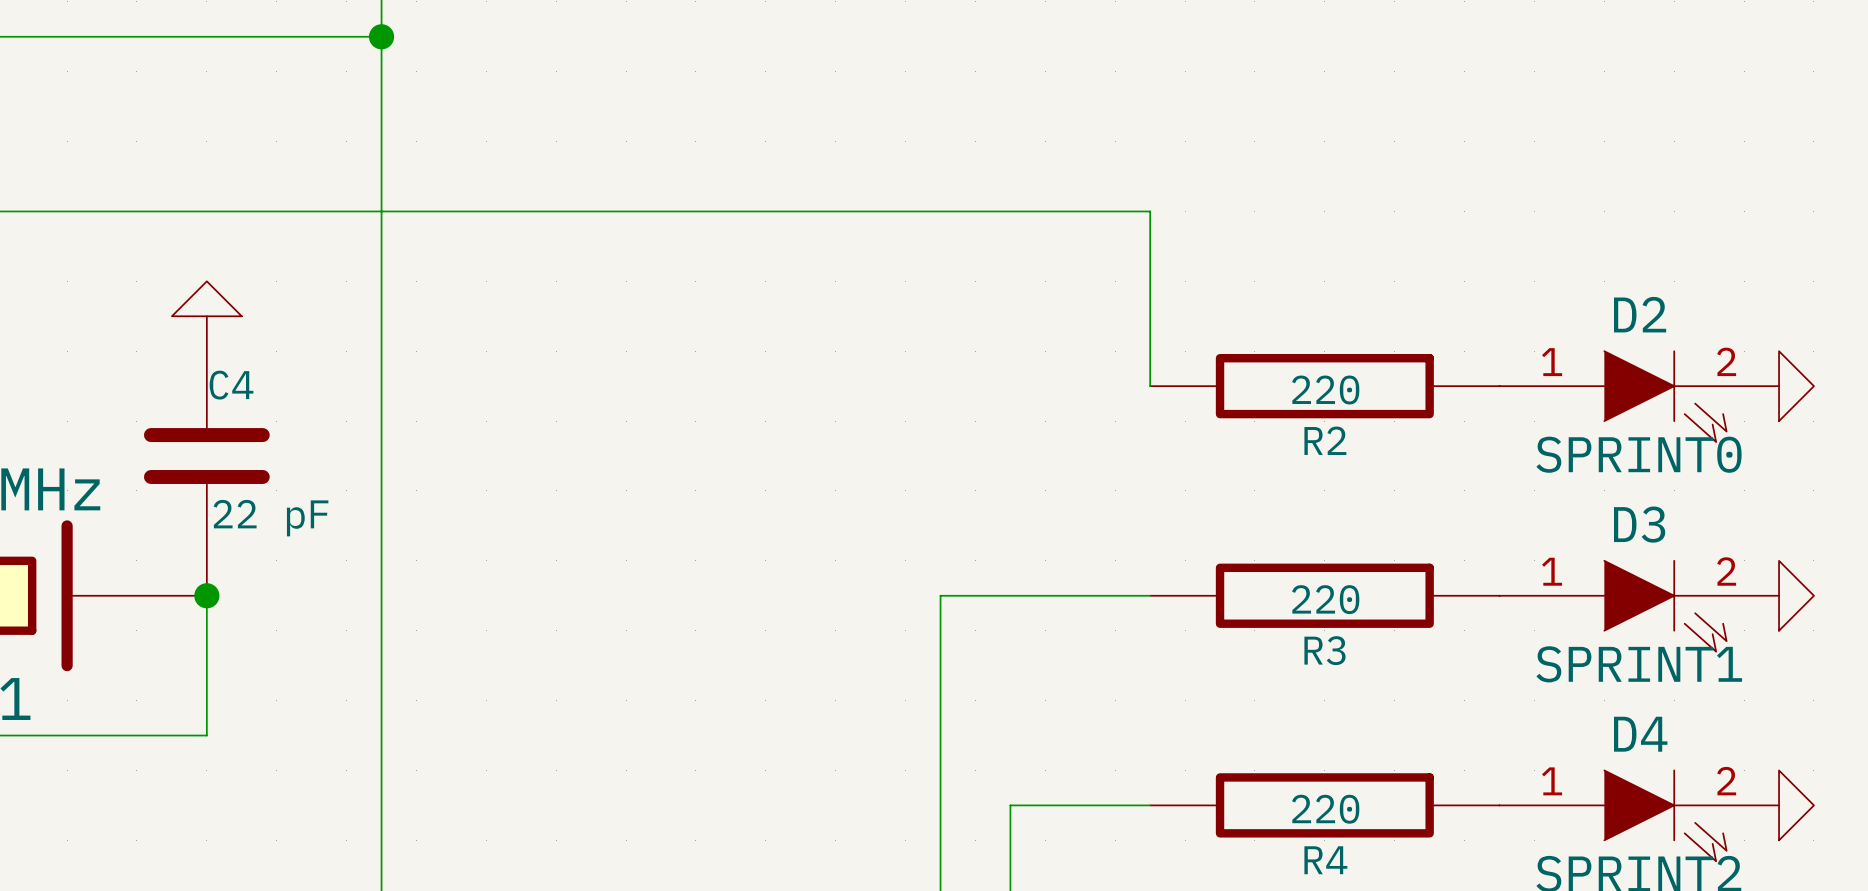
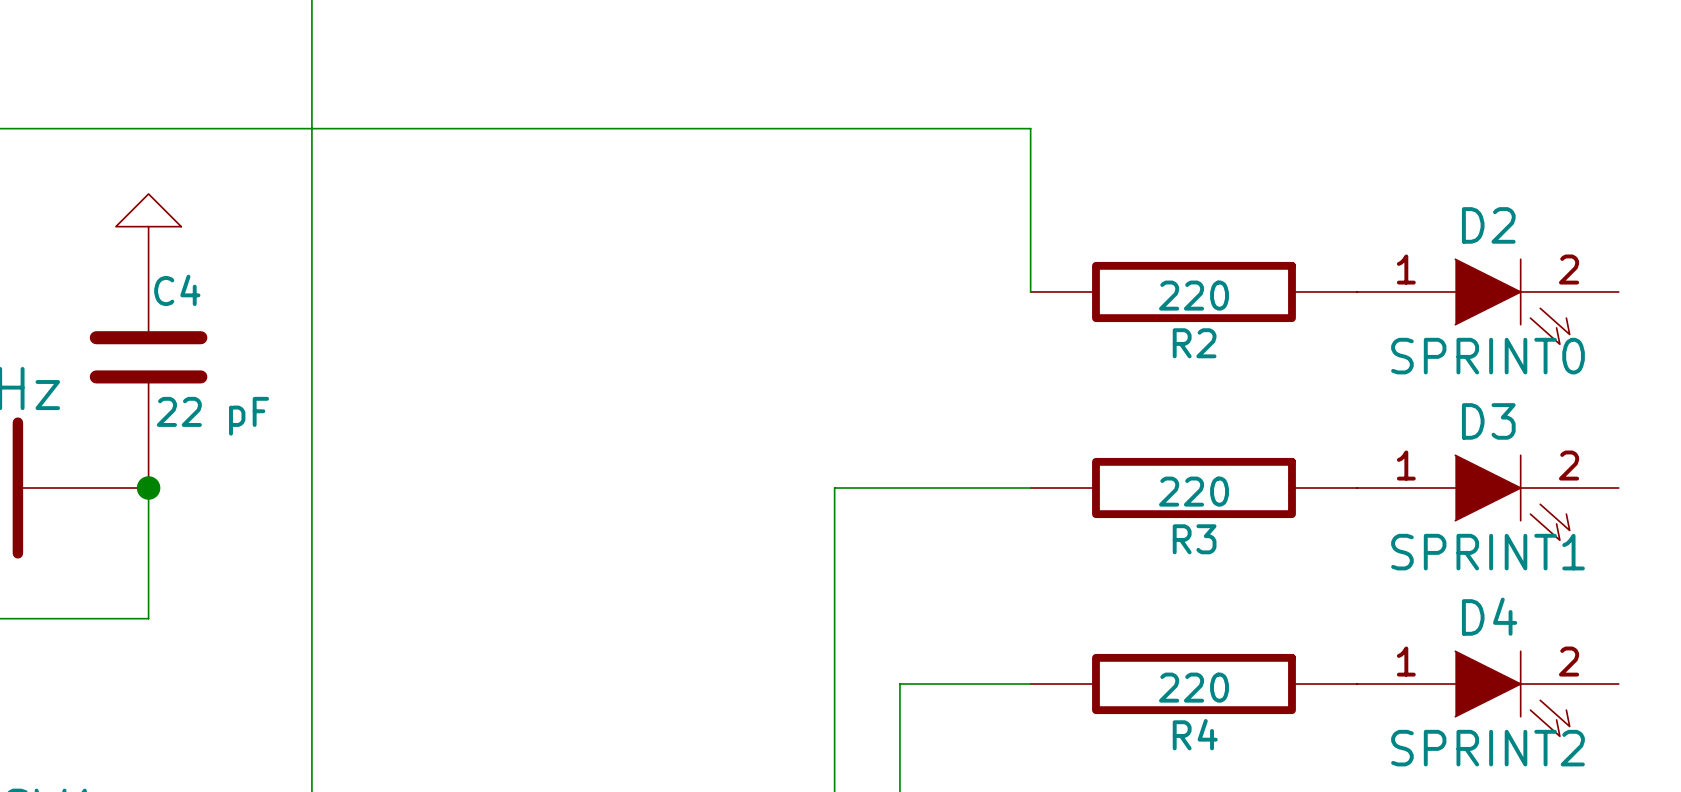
power symbol: (1796, 386) -> none
power symbol: (1796, 595) -> none
power symbol: (1796, 805) -> none

